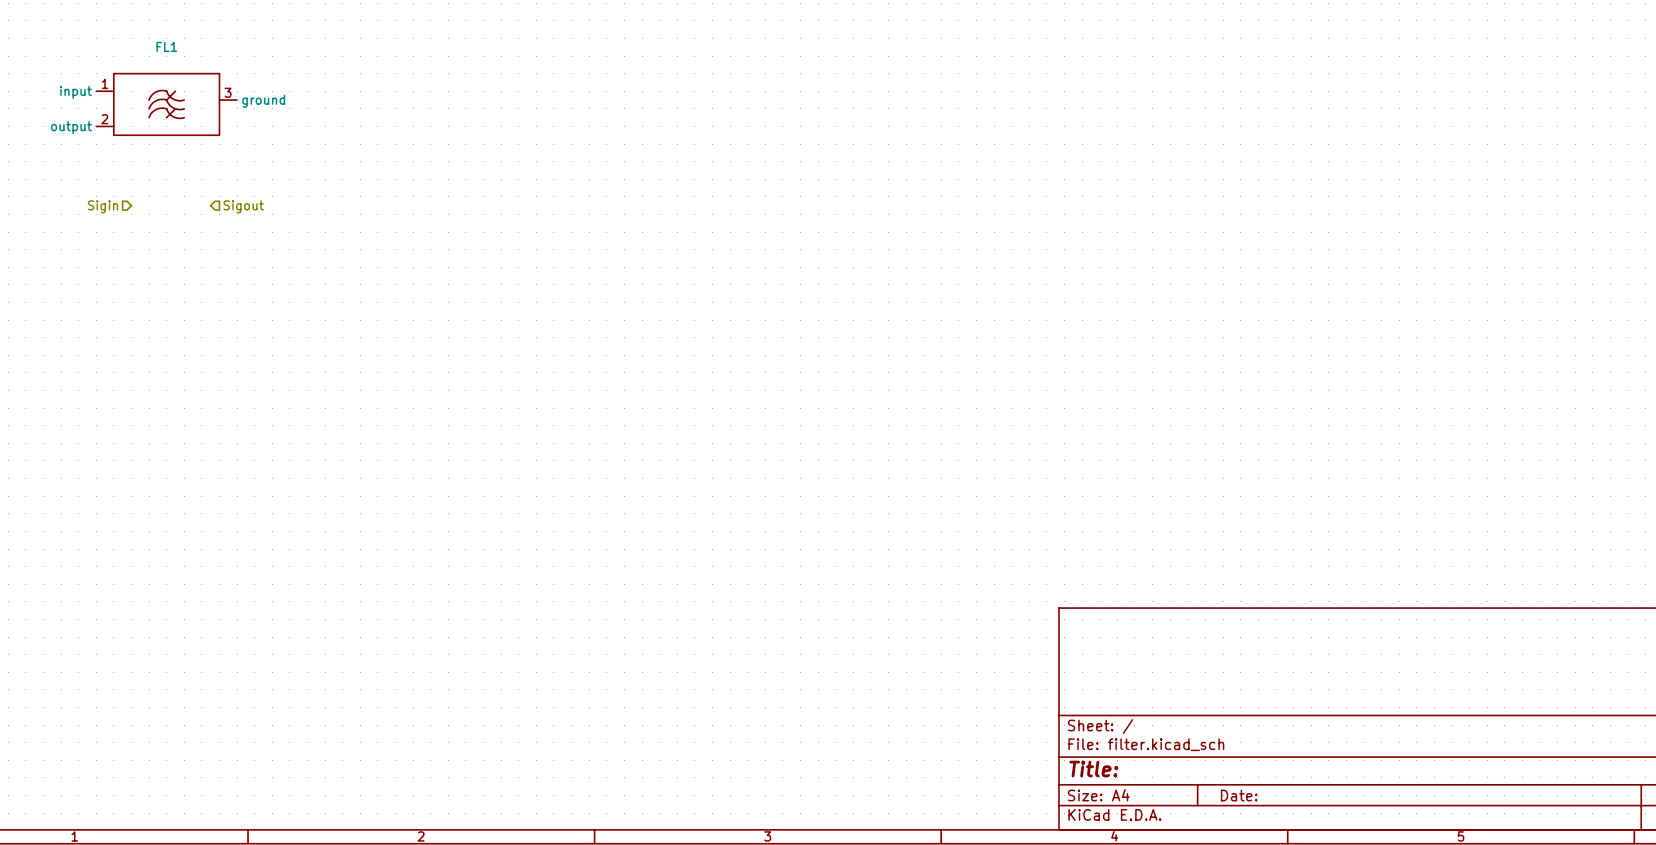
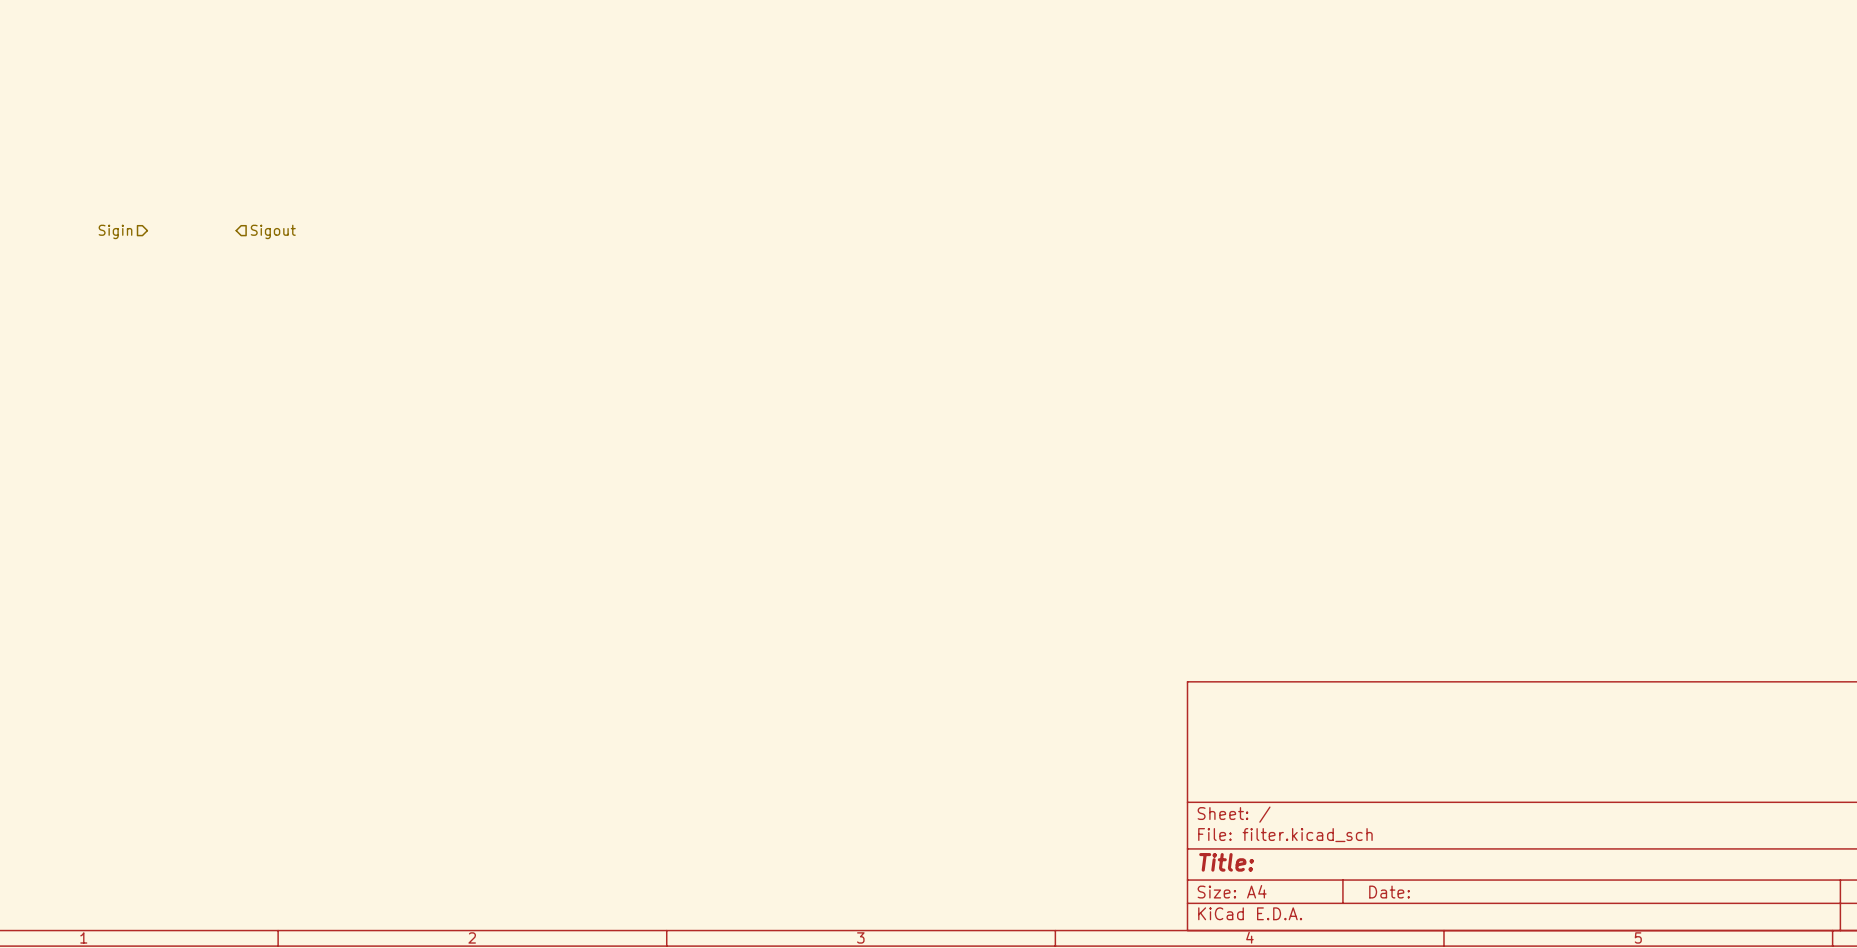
FL1: (166, 104) -> none

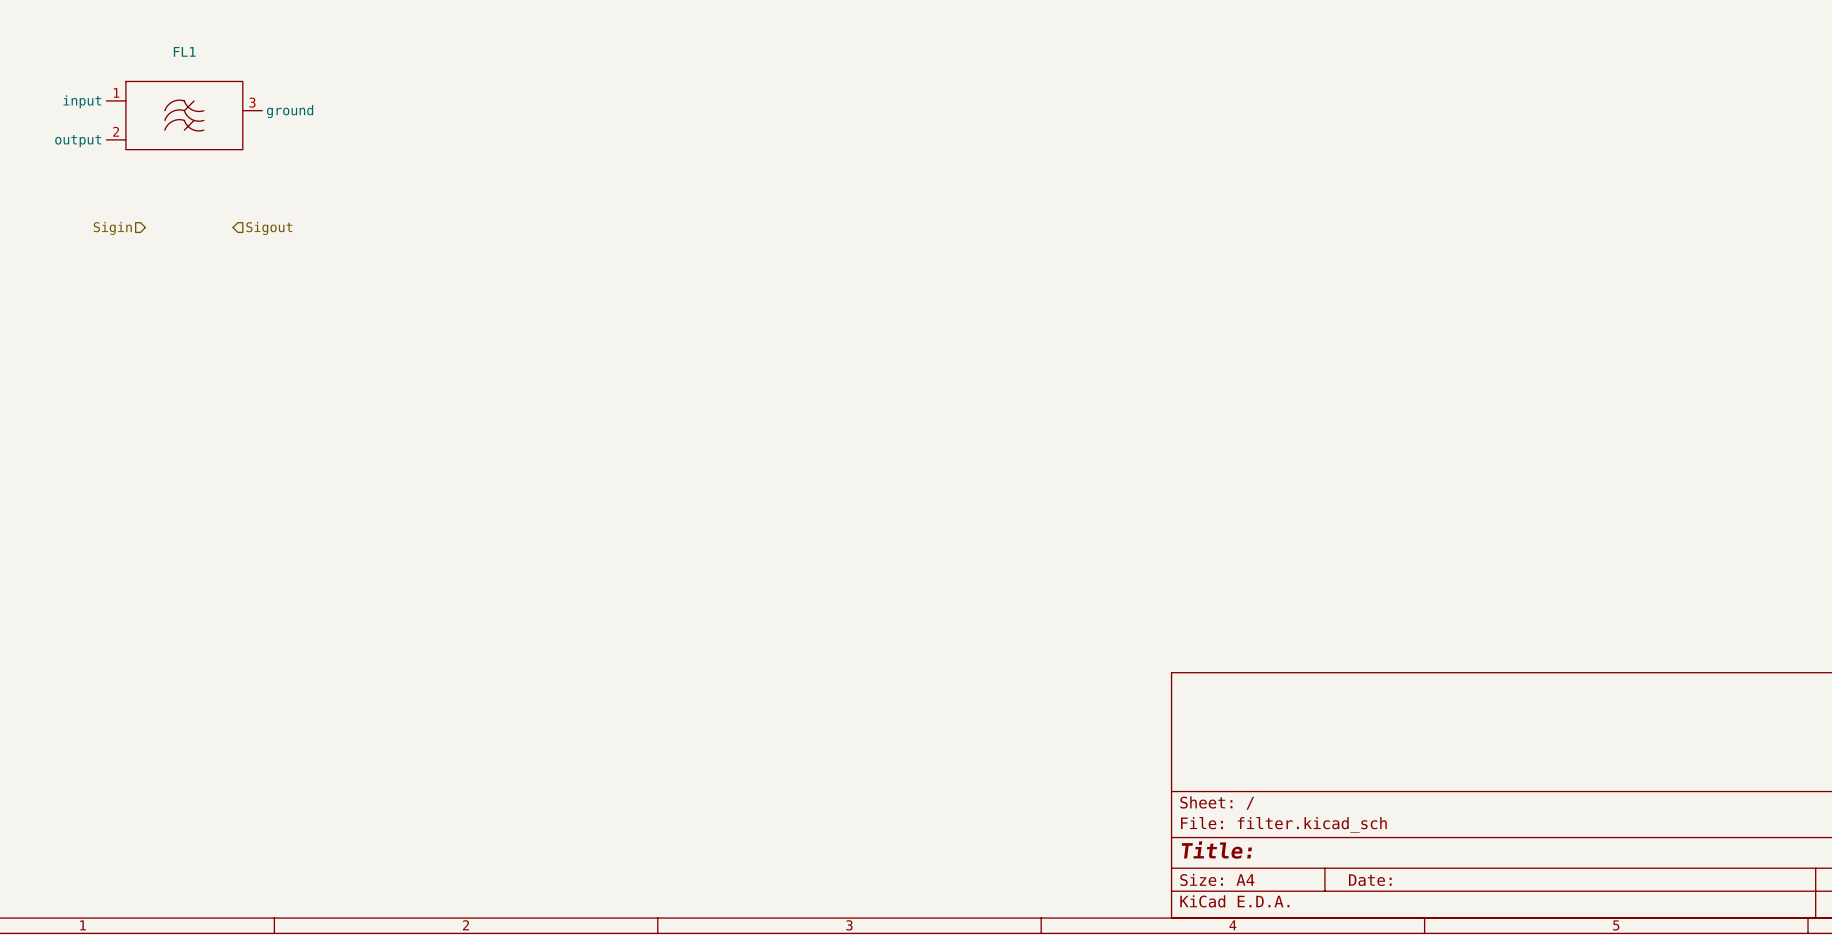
FL1: none -> (184, 115)

